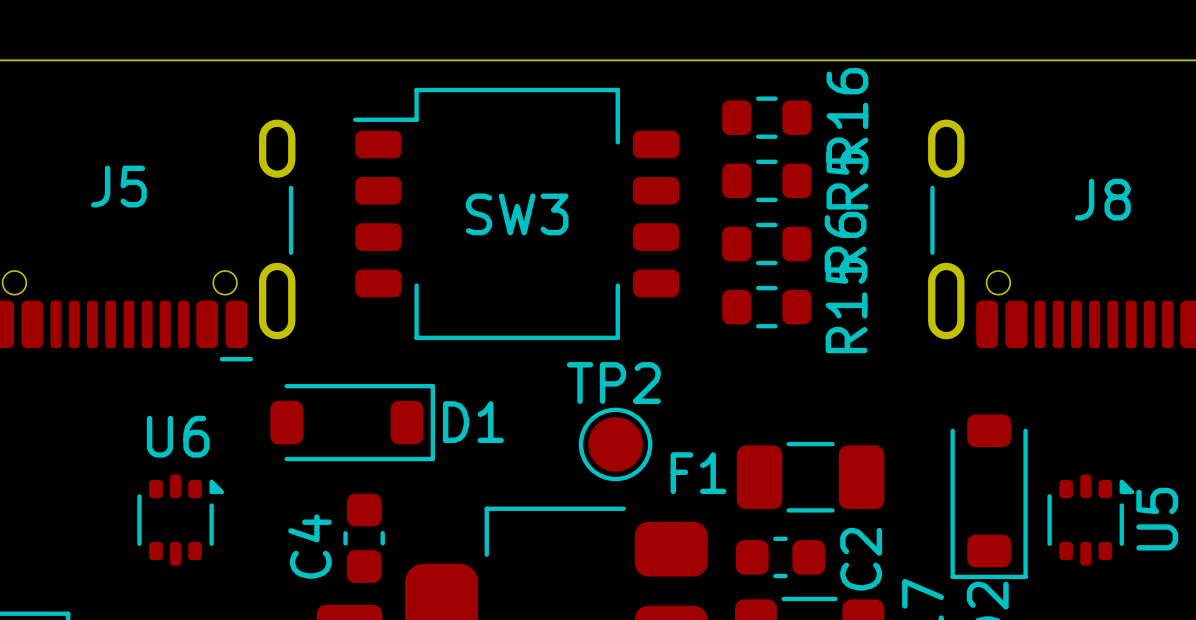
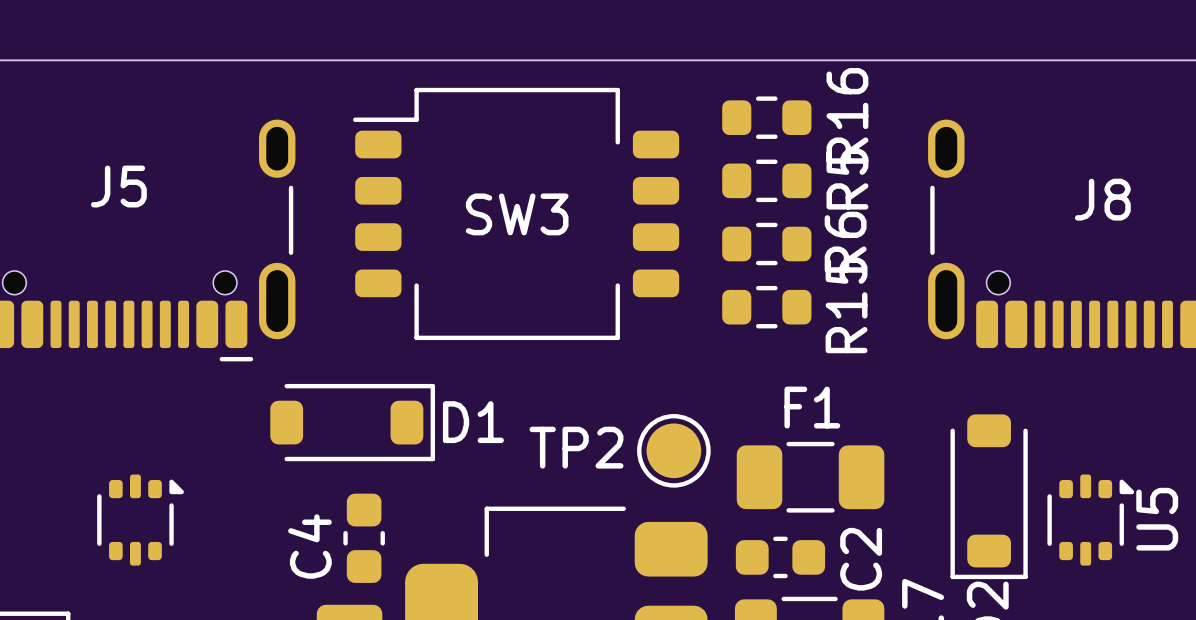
TP2 name position: TP2 (613, 383) -> TP2 (576, 447)
TP2 position: (615, 444) -> (673, 450)
F1 name position: F1 (698, 473) -> F1 (812, 407)
part: none -> (140, 520)
U6: (180, 520) -> none

